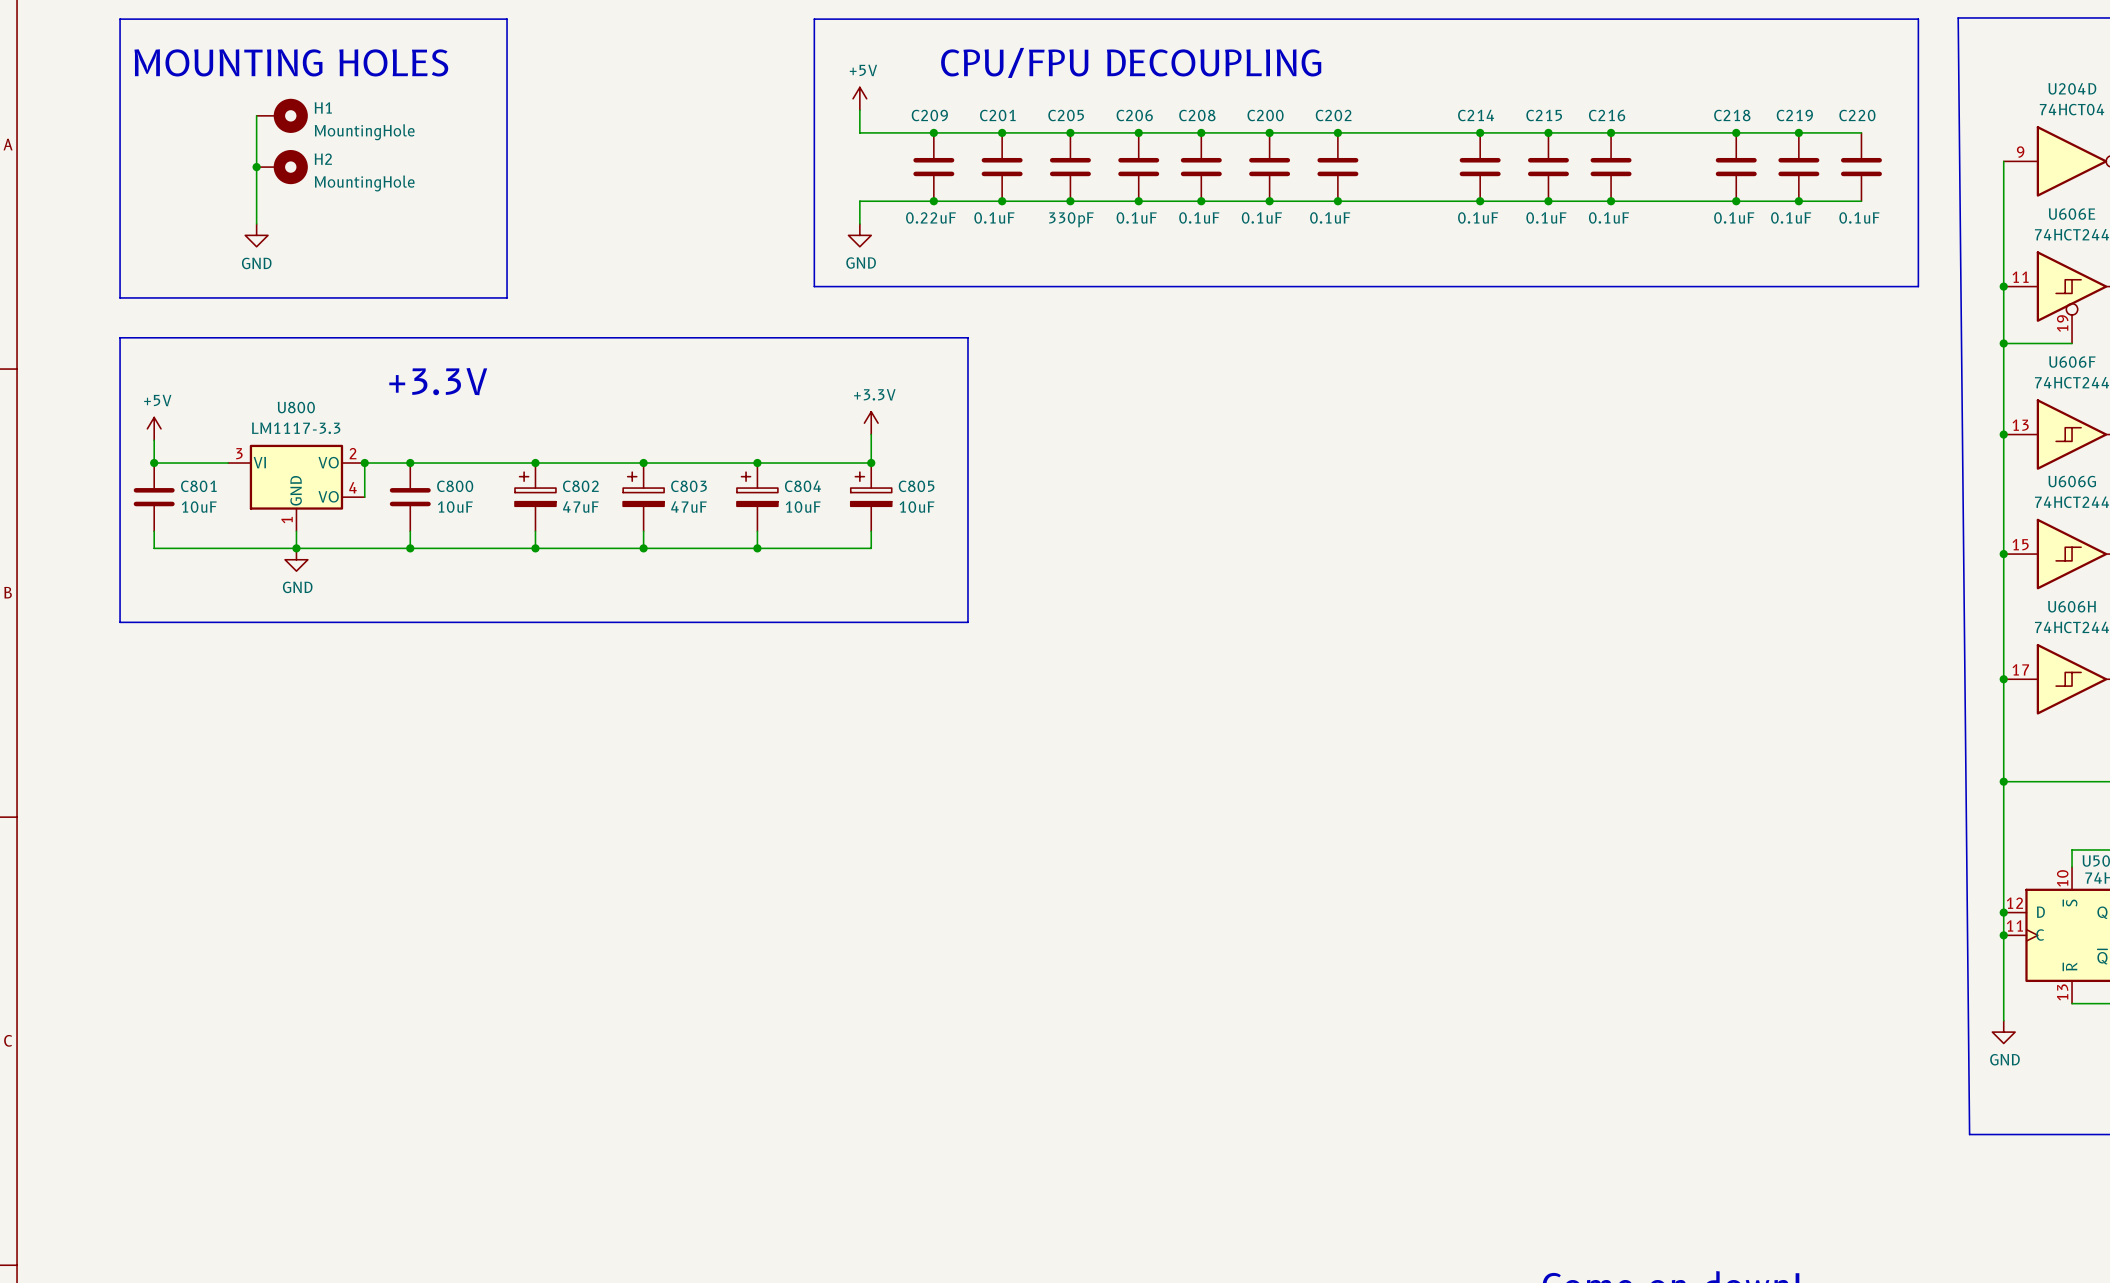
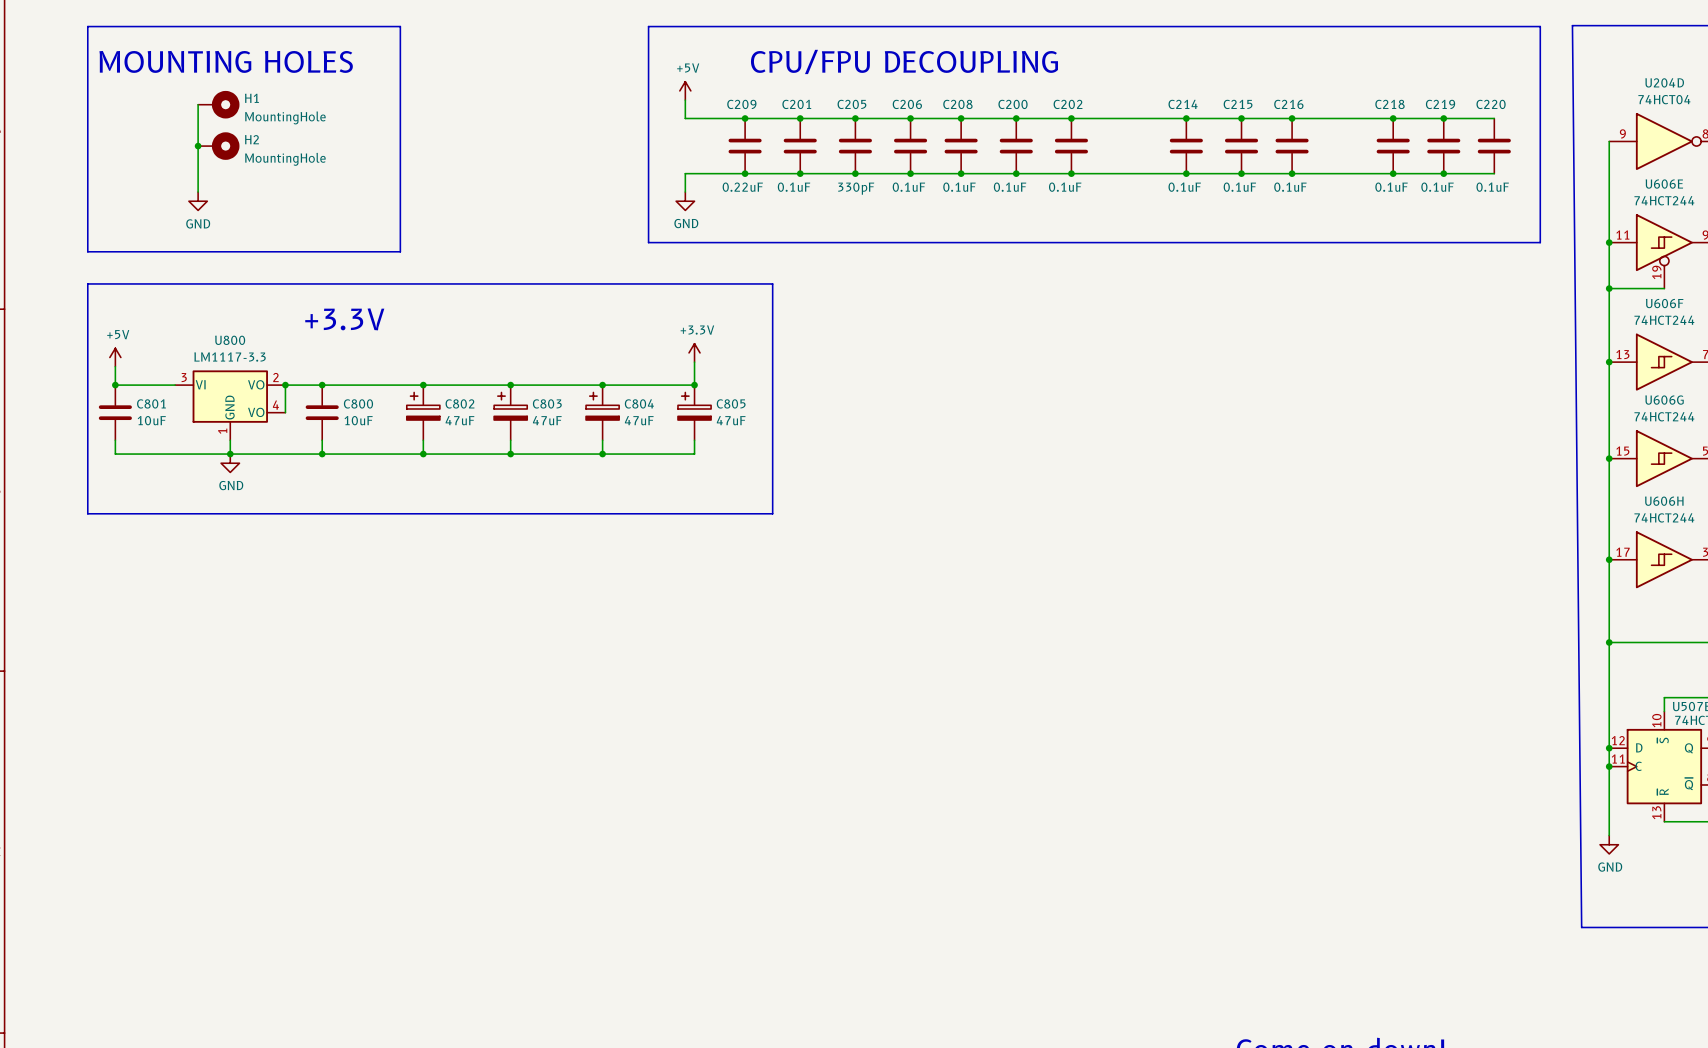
C804 value: 10uF (803, 507) -> 47uF (639, 420)
C805 value: 10uF (916, 507) -> 47uF (731, 420)

